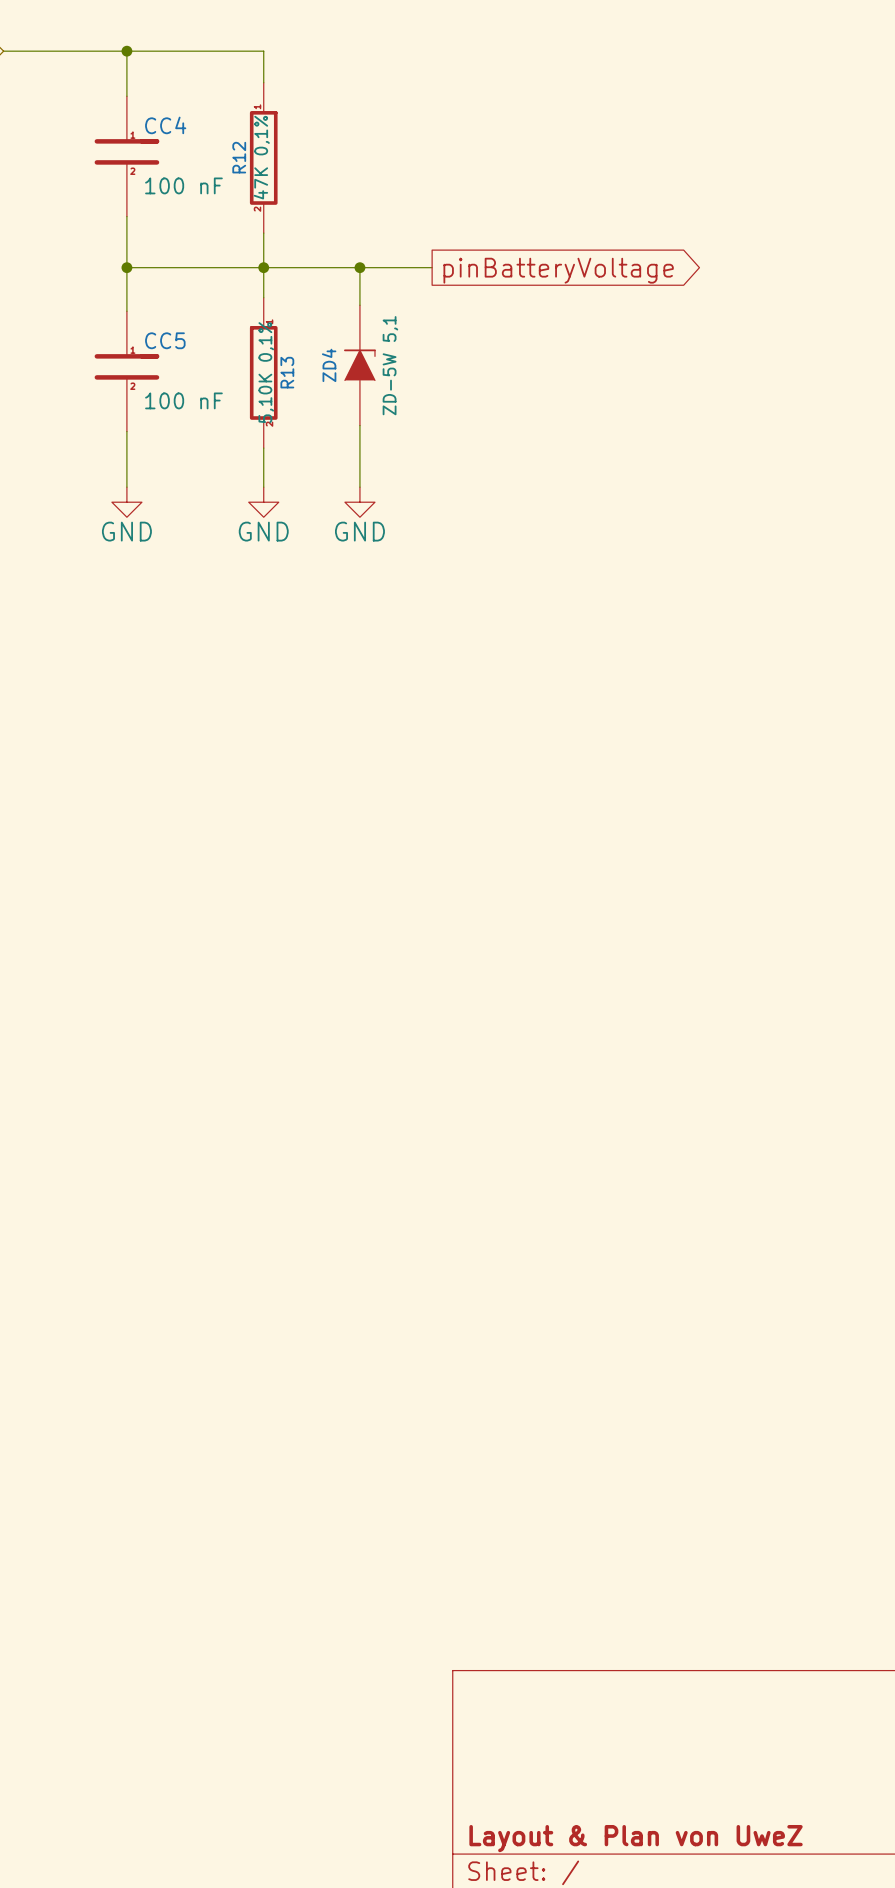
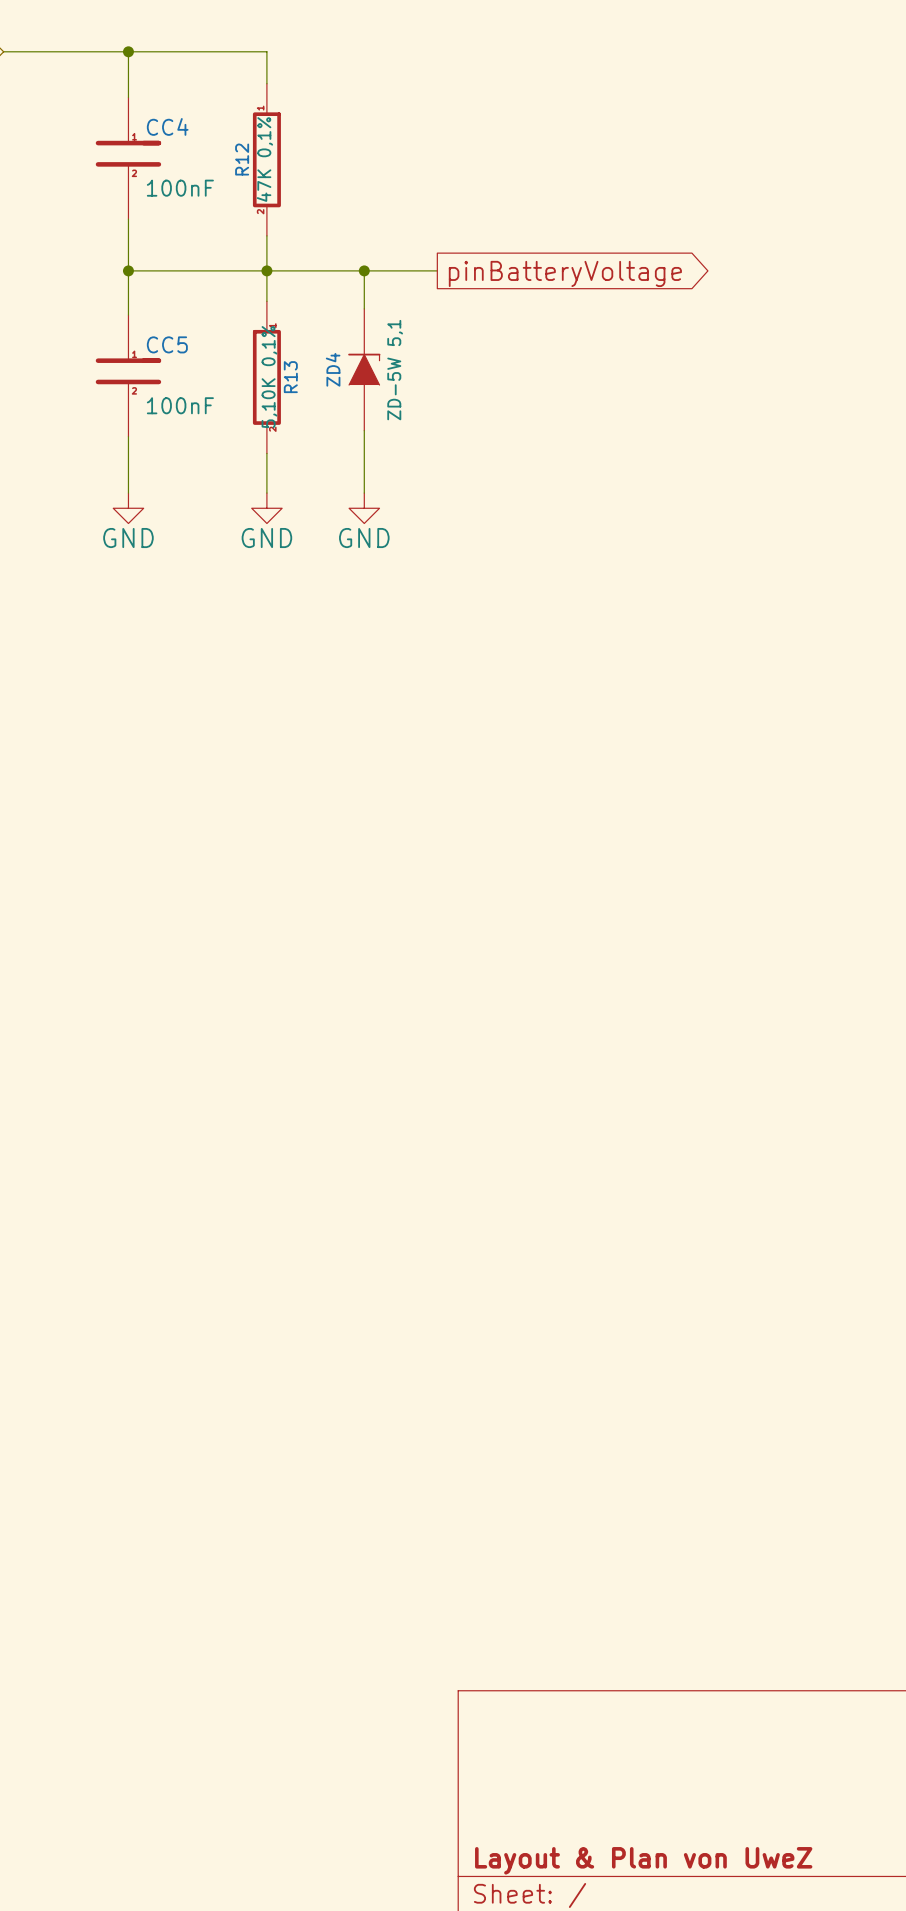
CC4 value: 100 nF (183, 185) -> 100nF (180, 188)
CC5 value: 100 nF (183, 400) -> 100nF (180, 405)

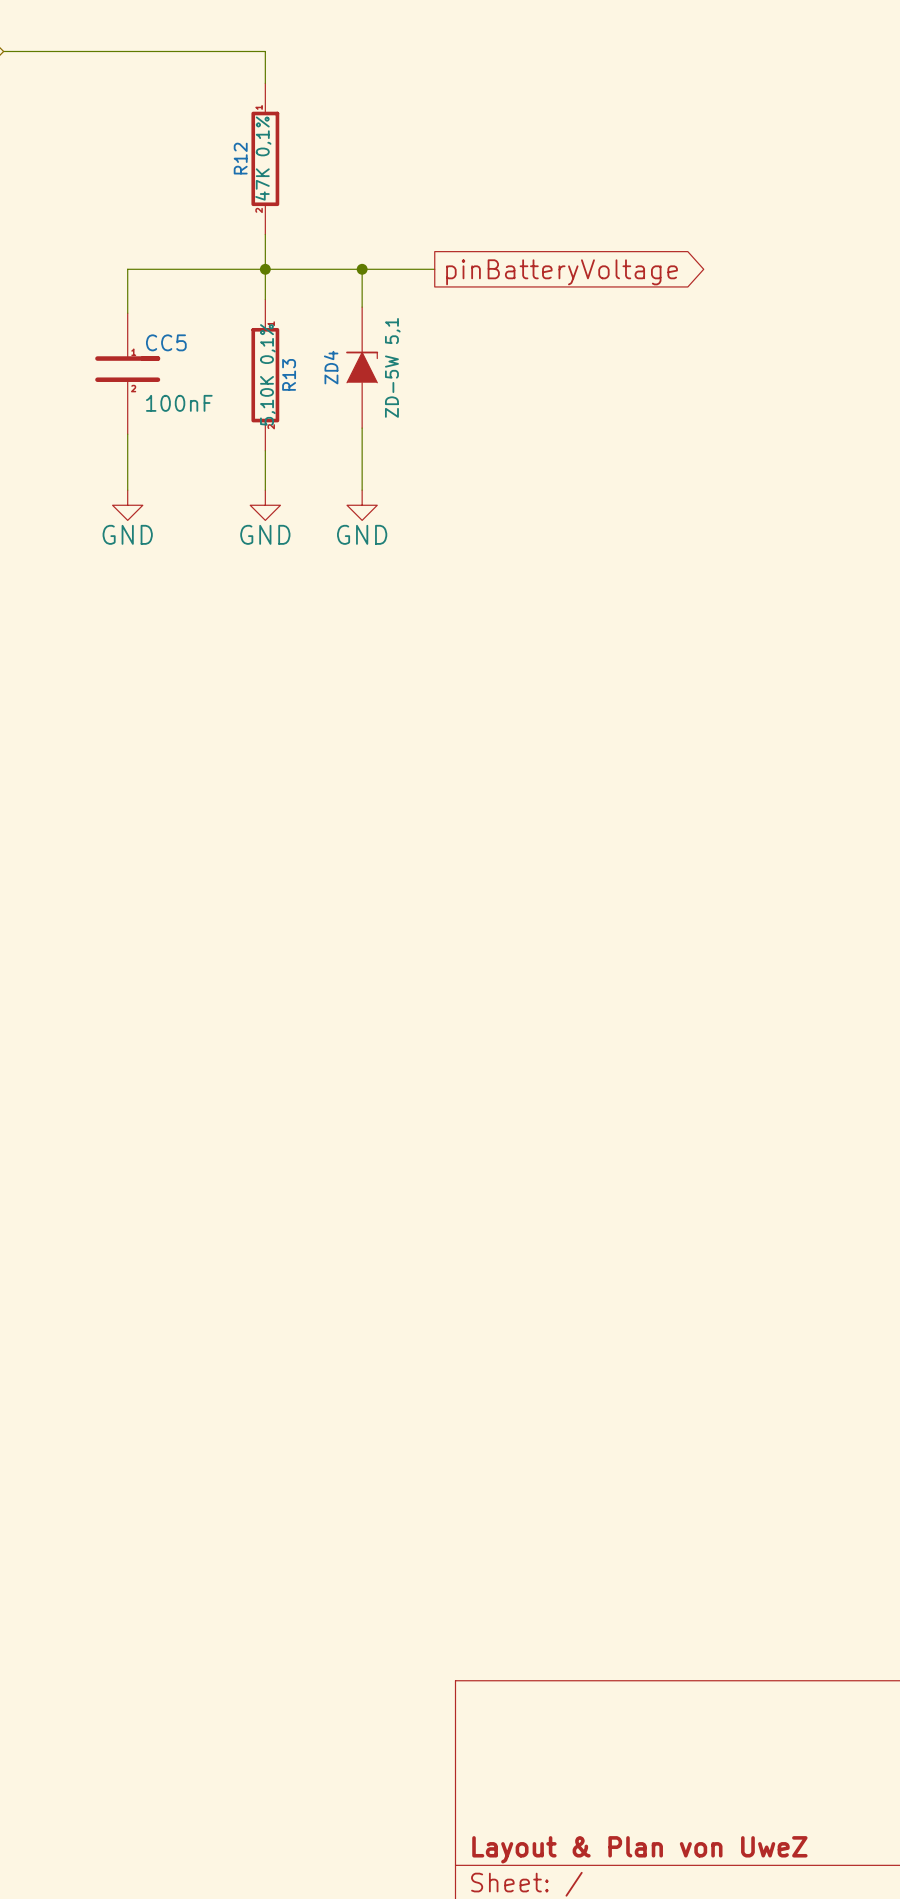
wire: (128, 51) (128, 97) -> none
junction: (128, 51) -> none
CC4: 100nF (128, 158) -> none
wire: (128, 219) (128, 270) -> none
junction: (128, 270) -> none

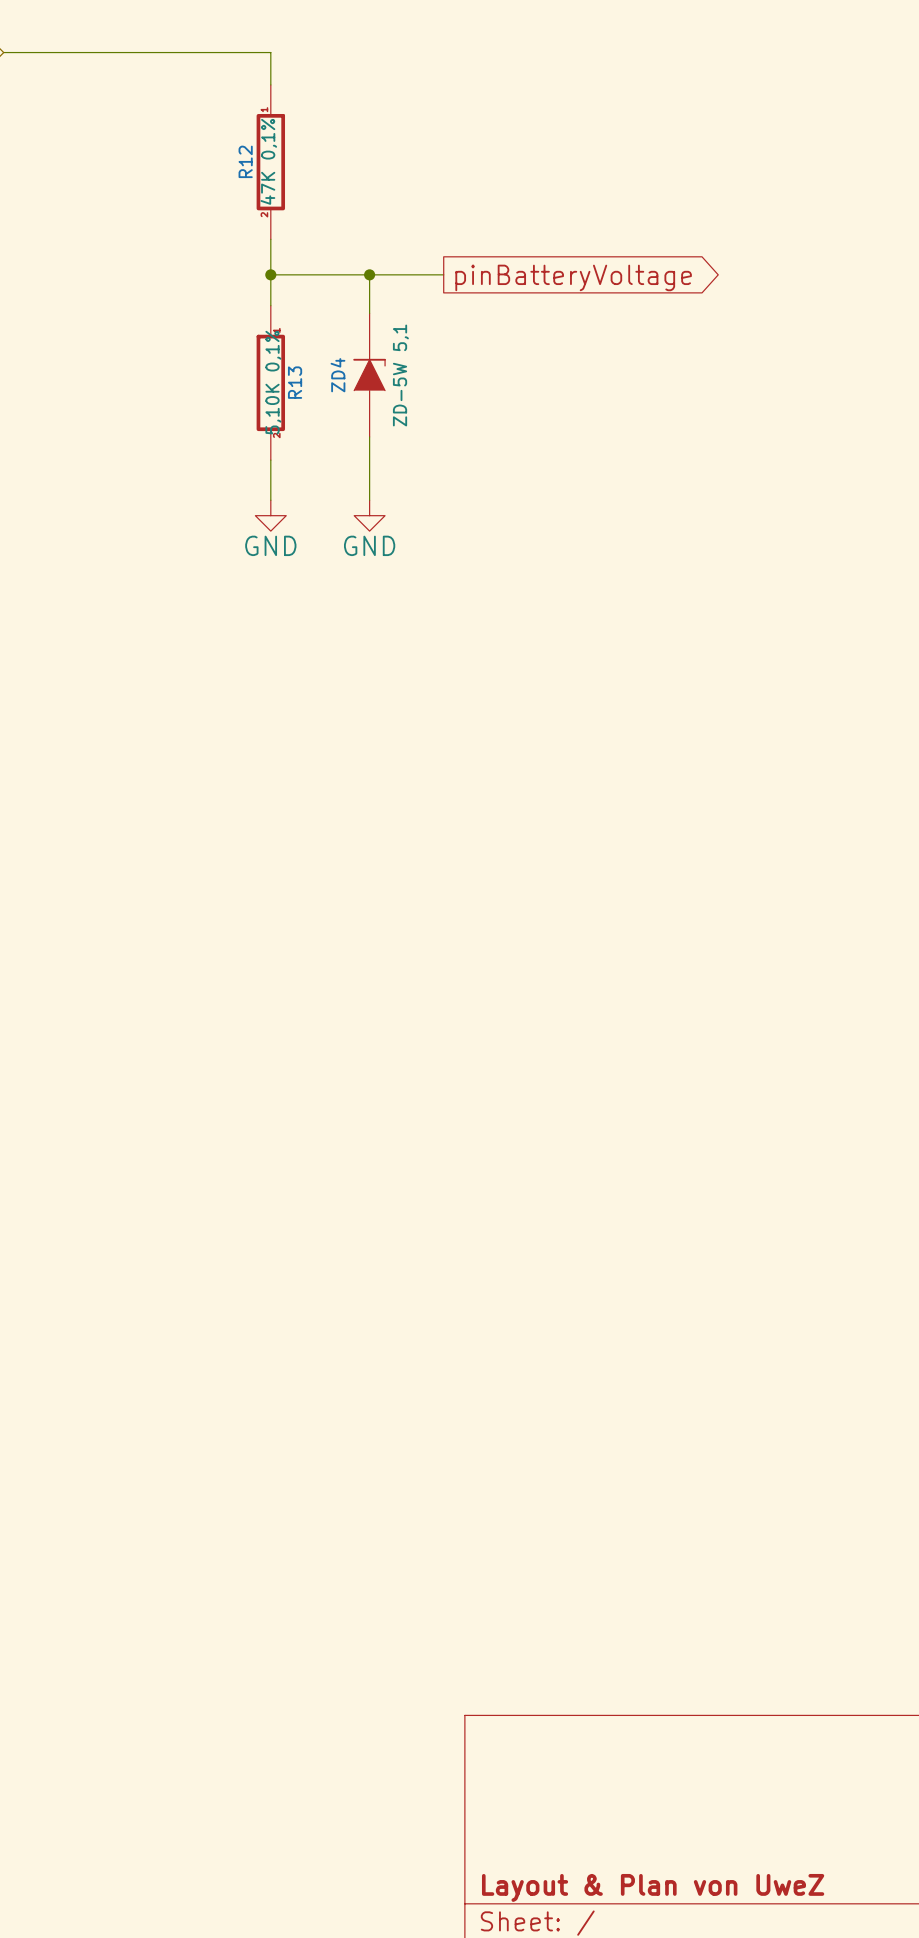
wire: (265, 269) (127, 269) (127, 313) -> none
CC5: 100nF (127, 373) -> none
wire: (127, 434) (127, 490) -> none
power symbol: GND (127, 505) -> none

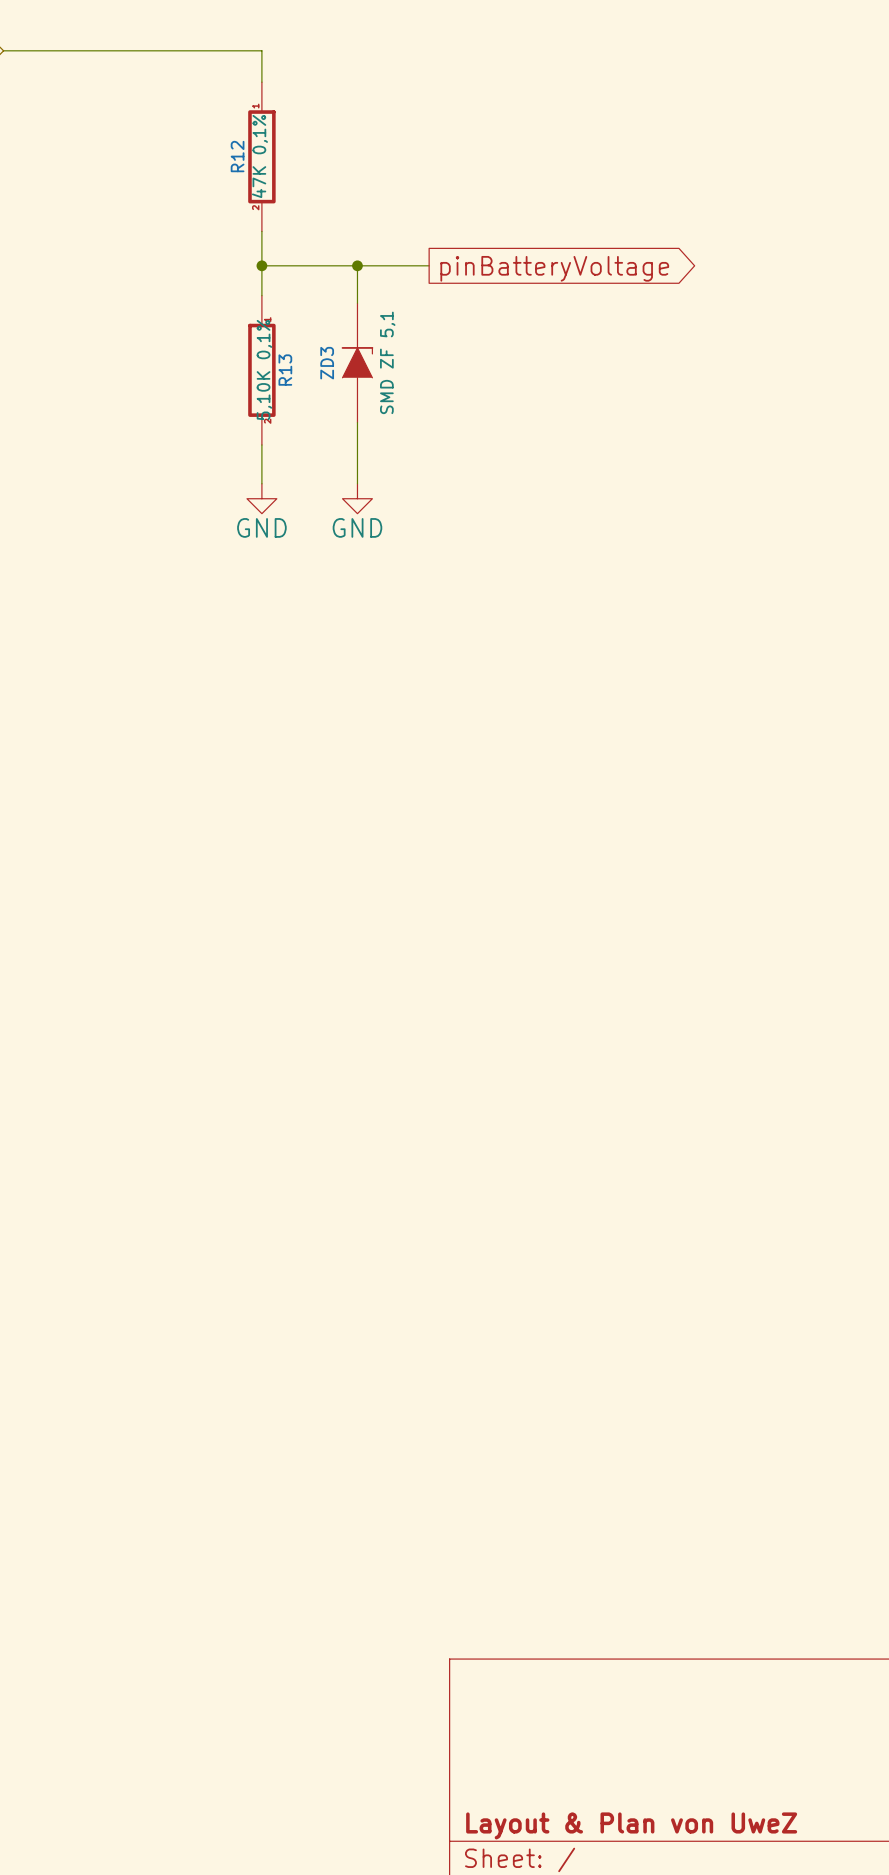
ZD4 name: ZD4 (337, 375) -> ZD3 (327, 363)
ZD4 value: ZD-5W 5,1 (400, 375) -> SMD ZF 5,1 (387, 362)

